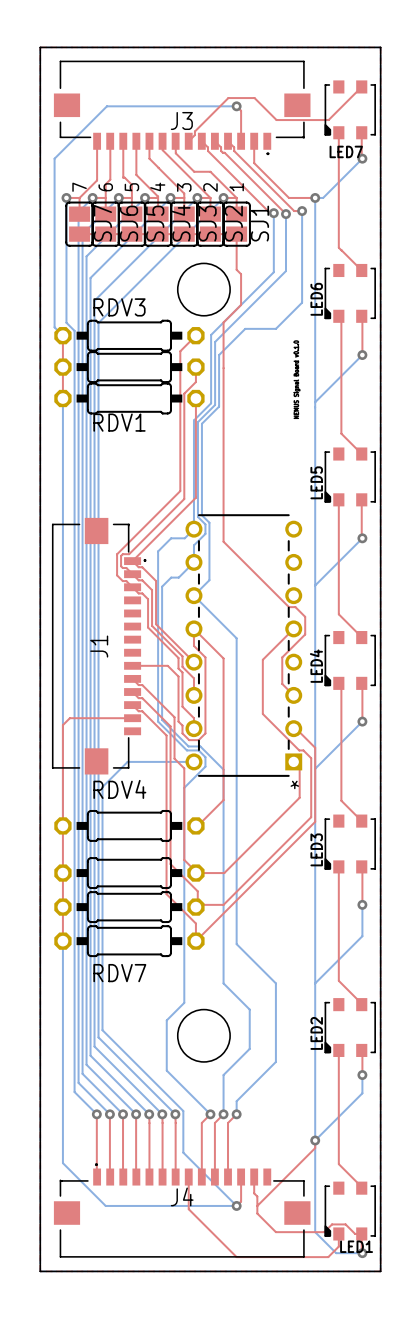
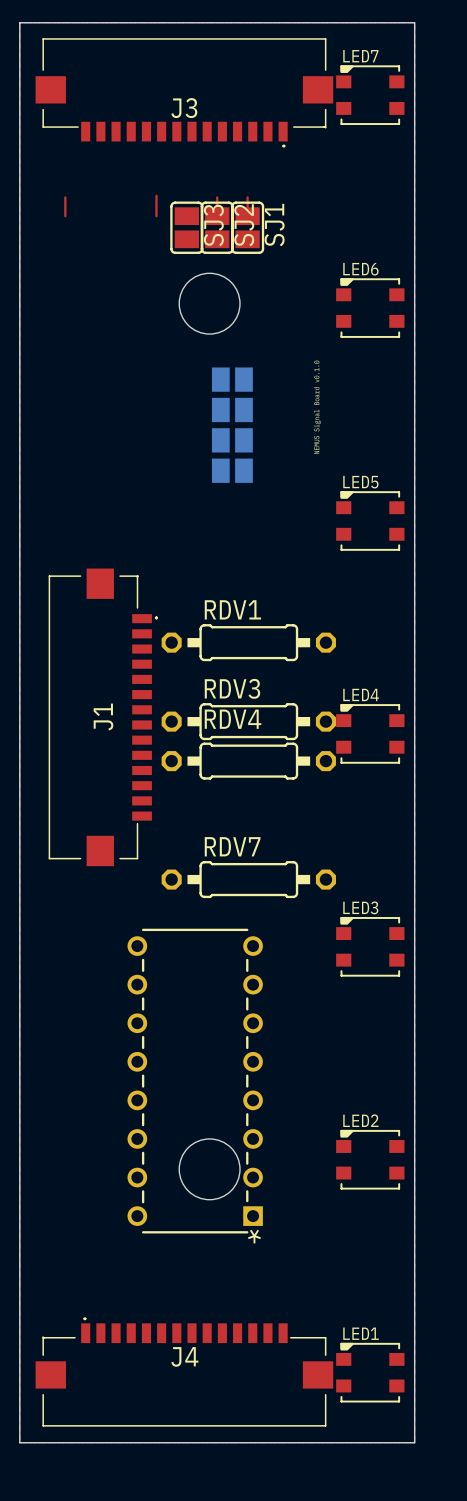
top track: (361, 86) (328, 120) (276, 120) (254, 98) (228, 98) (194, 131) (194, 135) (188, 141) -> none
top track: (236, 106) (241, 110) (241, 141) -> none
bottom track: (236, 106) (106, 106) (54, 158) (54, 327) (62, 335) -> none
via: (236, 106) -> none
LED7 rotation: 0° (350, 109) -> 90° clockwise (370, 95)
top track: (338, 132) (338, 247) (341, 250) -> none
top track: (361, 132) (362, 158) -> none
top track: (97, 141) (97, 180) (79, 197) (66, 197) -> none
top track: (110, 141) (110, 179) (105, 184) (105, 214) -> none
top track: (123, 141) (123, 177) -> none
top track: (136, 141) (136, 174) (158, 196) (145, 197) -> none
top track: (149, 141) (149, 158) (184, 193) (184, 214) -> none
top track: (162, 141) (162, 150) (210, 197) (197, 197) -> none
top track: (175, 141) (175, 153) (194, 171) (210, 171) (236, 197) (223, 197) -> none
top track: (201, 141) (208, 147) (208, 151) (270, 213) (273, 213) -> none
top track: (214, 141) (221, 147) (221, 151) (285, 214) -> none
top track: (228, 141) (234, 147) (234, 151) (294, 211) (302, 211) -> none
top track: (254, 141) (254, 163) (289, 197) (315, 197) -> none
LED7 name position: LED7 (346, 151) -> LED7 (360, 56)
bottom track: (362, 158) (323, 197) (315, 197) (315, 1232) (336, 1253) (362, 1253) -> none
via: (362, 158) -> none
top track: (123, 177) (131, 184) (131, 214) -> none
text: 4 (157, 186) -> none
text: 7 (79, 187) -> none
text: 6 (105, 187) -> none
text: 5 (131, 187) -> none
text: 3 (184, 187) -> none
text: 2 (210, 187) -> none
text: 1 (236, 187) -> none
bottom track: (66, 197) (66, 322) (74, 330) (74, 1092) (96, 1114) -> none
via: (66, 197) -> none
top track: (92, 197) (105, 197) -> none
bottom track: (92, 197) (78, 212) (78, 1082) (109, 1114) -> none
via: (92, 197) -> none
top track: (118, 197) (131, 197) -> none
bottom track: (118, 197) (82, 234) (82, 1073) (123, 1114) -> none
via: (118, 197) -> none
bottom track: (145, 197) (86, 256) (86, 1064) (136, 1114) -> none
via: (145, 197) -> none
top track: (170, 197) (184, 197) -> none
bottom track: (170, 197) (90, 277) (90, 1055) (149, 1114) -> none
via: (170, 197) -> none
bottom track: (197, 197) (94, 300) (94, 1046) (162, 1114) -> none
via: (197, 197) -> none
bottom track: (223, 197) (98, 323) (98, 1037) (175, 1114) -> none
via: (223, 197) -> none
via: (315, 197) -> none
bottom track: (302, 211) (302, 302) (275, 328) (245, 328) (219, 355) (219, 406) (201, 423) (201, 515) (209, 522) (209, 580) (193, 595) (236, 638) (236, 944) (275, 983) (275, 1061) (236, 1101) (236, 1114) -> none
via: (302, 211) -> none
bottom track: (273, 213) (273, 272) (211, 334) (211, 403) (193, 420) (193, 529) (184, 538) (171, 538) (158, 551) (158, 721) (186, 750) (198, 750) (205, 757) (205, 766) (184, 787) (184, 1002) (166, 1020) (166, 1070) (210, 1114) -> none
via: (273, 213) -> none
bottom track: (285, 214) (285, 271) (215, 341) (215, 404) (197, 422) (197, 516) (205, 524) (205, 533) (193, 545) (193, 562) (178, 577) (171, 577) (162, 586) (162, 719) (188, 746) (200, 746) (223, 769) (223, 983) (249, 1009) (249, 1048) (223, 1075) (223, 1114) -> none
via: (285, 214) -> none
SJ7 side: top (79, 224) -> bottom (232, 470)
SJ6 side: top (105, 224) -> bottom (232, 440)
SJ5 side: top (131, 224) -> bottom (232, 409)
SJ4 side: top (158, 224) -> bottom (232, 379)
top track: (79, 234) (236, 234) (236, 269) (241, 274) (241, 304) (223, 322) (223, 541) (288, 607) (295, 607) (305, 616) (305, 634) (282, 657) (282, 683) (293, 695) -> none
top track: (341, 250) (361, 270) -> none
LED6 rotation: 0° (350, 293) -> 90° clockwise (370, 308)
top track: (338, 316) (341, 318) (341, 433) (361, 454) -> none
top track: (361, 316) (362, 355) -> none
top track: (62, 335) (62, 398) -> none
RDV3 position: (129, 335) -> (248, 721)
top track: (195, 335) (180, 351) (180, 491) (117, 554) (117, 575) (148, 599) (148, 627) (178, 657) (178, 668) (182, 672) (182, 706) (193, 718) (193, 728) -> none
bottom track: (362, 355) (315, 402) -> none
via: (362, 355) -> none
part: (129, 367) -> none
top track: (195, 367) (195, 382) (184, 393) (184, 499) (129, 554) (121, 555) (121, 566) (126, 568) (152, 590) (152, 625) (182, 656) (182, 666) (193, 678) (193, 695) -> none
bottom track: (62, 398) (62, 825) -> none
RDV1 position: (129, 398) -> (248, 642)
top track: (195, 398) (195, 497) (132, 561) (138, 567) (142, 567) (156, 580) (156, 624) (193, 662) -> none
RDV1 name position: RDV1 (119, 422) -> RDV1 (232, 609)
LED5 rotation: 0° (350, 476) -> 90° clockwise (370, 520)
top track: (338, 499) (338, 614) (361, 637) -> none
top track: (361, 499) (362, 538) -> none
bottom track: (362, 538) (315, 585) -> none
via: (362, 538) -> none
top track: (293, 628) (262, 659) (262, 713) (299, 750) (303, 750) (311, 758) (311, 817) (223, 904) (198, 904) (195, 907) -> none
part position: (243, 645) -> (195, 1081)
J1 position: (99, 646) -> (103, 717)
LED4 rotation: 0° (350, 660) -> 90° clockwise (370, 733)
top track: (132, 665) (167, 665) (178, 676) (178, 721) (182, 725) (182, 733) (189, 740) (198, 740) (205, 733) (205, 657) (193, 645) (193, 628) (223, 658) (223, 800) (195, 825) -> none
top track: (132, 678) (138, 685) (142, 685) (174, 717) (174, 758) (184, 768) (184, 859) (197, 873) -> none
top track: (338, 683) (341, 685) (341, 800) (361, 821) -> none
top track: (361, 683) (362, 721) -> none
top track: (132, 692) (138, 698) (142, 698) (170, 726) (170, 864) (197, 891) (197, 905) -> none
top track: (132, 705) (138, 711) (142, 711) (166, 735) (166, 894) (195, 923) (195, 941) (315, 821) (315, 747) (296, 728) (293, 728) -> none
top track: (132, 718) (69, 718) (62, 725) (62, 941) -> none
bottom track: (362, 721) (315, 768) -> none
via: (362, 721) -> none
bottom track: (193, 761) (127, 761) (102, 787) (102, 1030) (183, 1111) (183, 1152) (236, 1205) (105, 1205) (62, 1163) (62, 941) -> none
top track: (293, 761) (299, 767) (299, 797) (224, 873) (195, 873) -> none
RDV4 position: (129, 825) -> (248, 761)
LED3 rotation: 0° (350, 843) -> 90° clockwise (370, 946)
top track: (338, 866) (338, 980) (361, 1004) -> none
top track: (361, 866) (362, 904) -> none
part: (129, 873) -> none
bottom track: (362, 904) (362, 936) (315, 983) -> none
via: (362, 904) -> none
part: (129, 907) -> none
RDV7 position: (129, 941) -> (248, 879)
RDV7 name position: RDV7 (119, 973) -> RDV7 (232, 846)
LED2 rotation: 0° (350, 1027) -> 90° clockwise (370, 1159)
top track: (338, 1050) (338, 1164) (361, 1188) -> none
top track: (361, 1050) (362, 1075) -> none
bottom track: (362, 1075) (362, 1093) (315, 1140) -> none
via: (362, 1075) -> none
top track: (96, 1114) (97, 1177) -> none
via: (96, 1114) -> none
top track: (109, 1114) (110, 1177) -> none
via: (109, 1114) -> none
top track: (123, 1114) (123, 1177) -> none
via: (123, 1114) -> none
top track: (136, 1114) (136, 1177) -> none
via: (136, 1114) -> none
top track: (149, 1114) (149, 1177) -> none
via: (149, 1114) -> none
top track: (162, 1114) (162, 1177) -> none
via: (162, 1114) -> none
top track: (175, 1114) (175, 1177) -> none
via: (175, 1114) -> none
top track: (210, 1114) (201, 1122) (201, 1177) -> none
via: (210, 1114) -> none
top track: (223, 1114) (214, 1122) (214, 1177) -> none
via: (223, 1114) -> none
top track: (236, 1114) (228, 1122) (228, 1177) -> none
via: (236, 1114) -> none
top track: (315, 1140) (315, 1148) (257, 1205) -> none
via: (315, 1140) -> none
top track: (188, 1177) (188, 1209) (236, 1257) (328, 1257) (338, 1246) (338, 1233) -> none
top track: (241, 1177) (241, 1201) (236, 1205) -> none
top track: (254, 1177) (257, 1213) (275, 1232) (324, 1232) (332, 1224) (345, 1224) (355, 1233) (361, 1233) (362, 1253) -> none
via: (236, 1205) -> none
LED1 rotation: 0° (350, 1211) -> 90° clockwise (370, 1372)
LED1 name position: LED1 (356, 1246) -> LED1 (361, 1333)
via: (362, 1253) -> none

